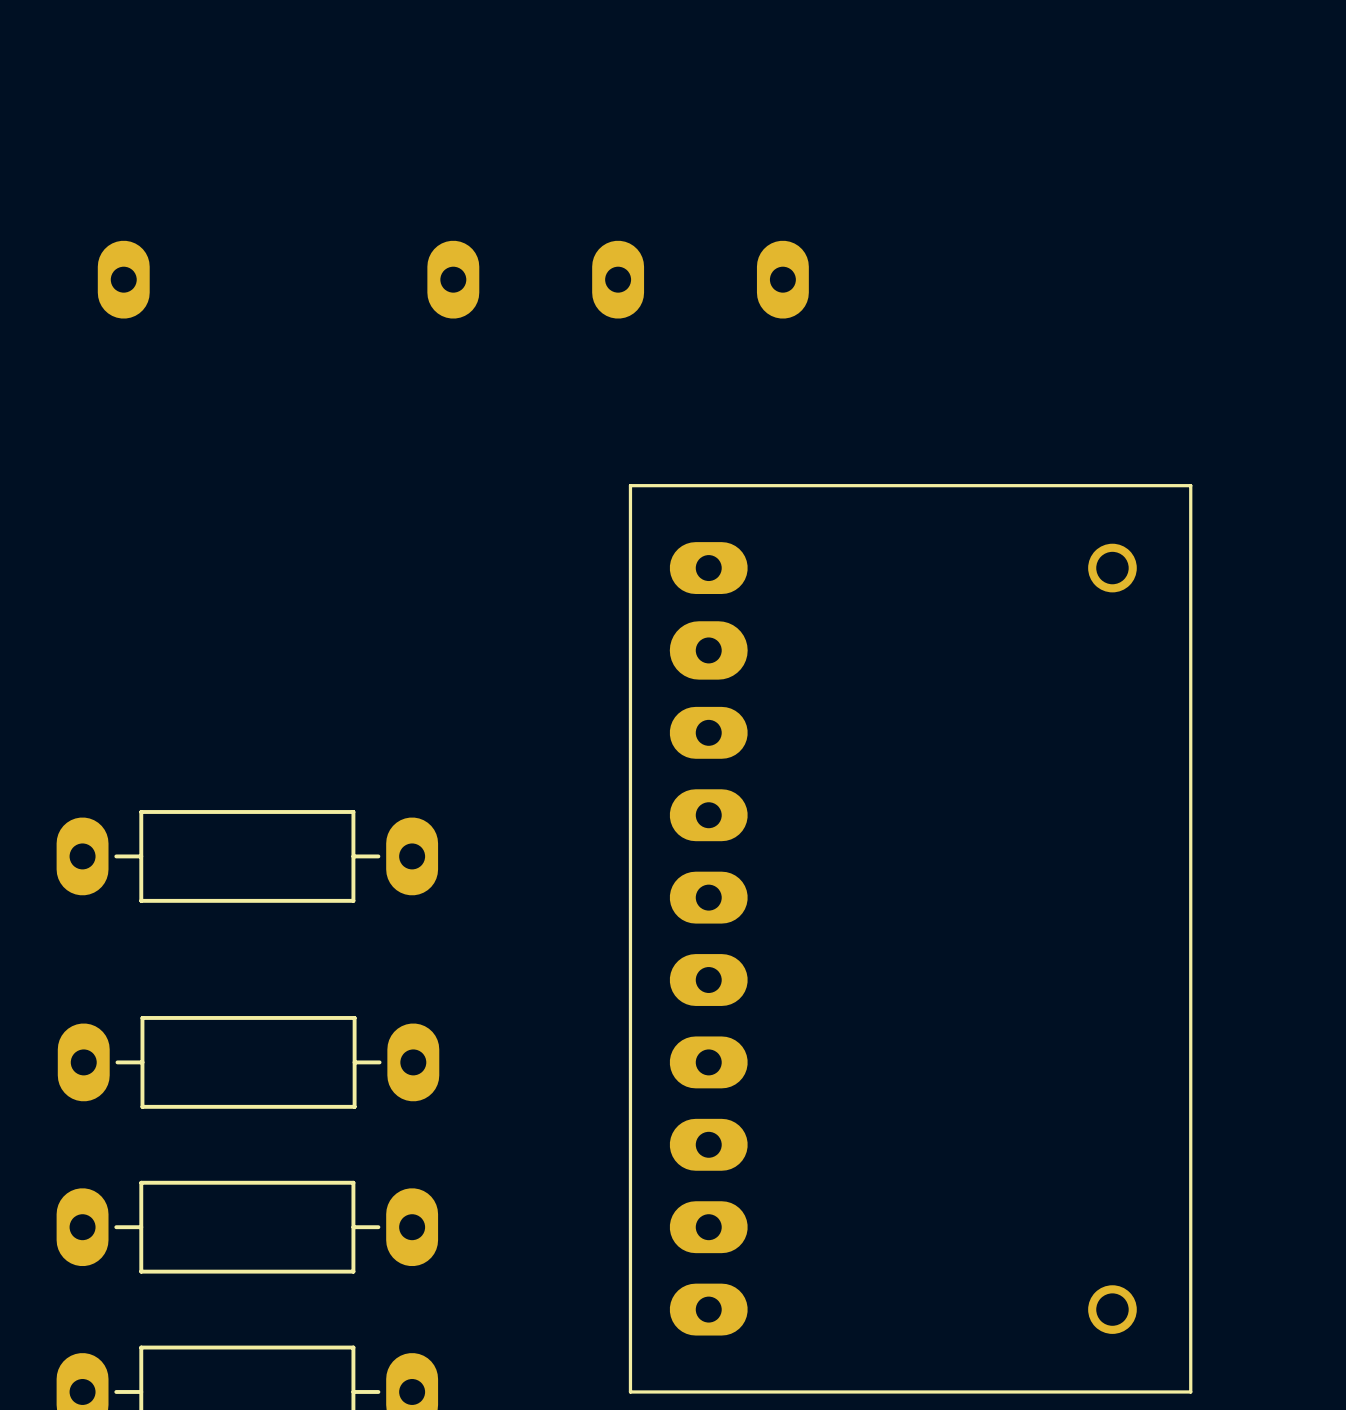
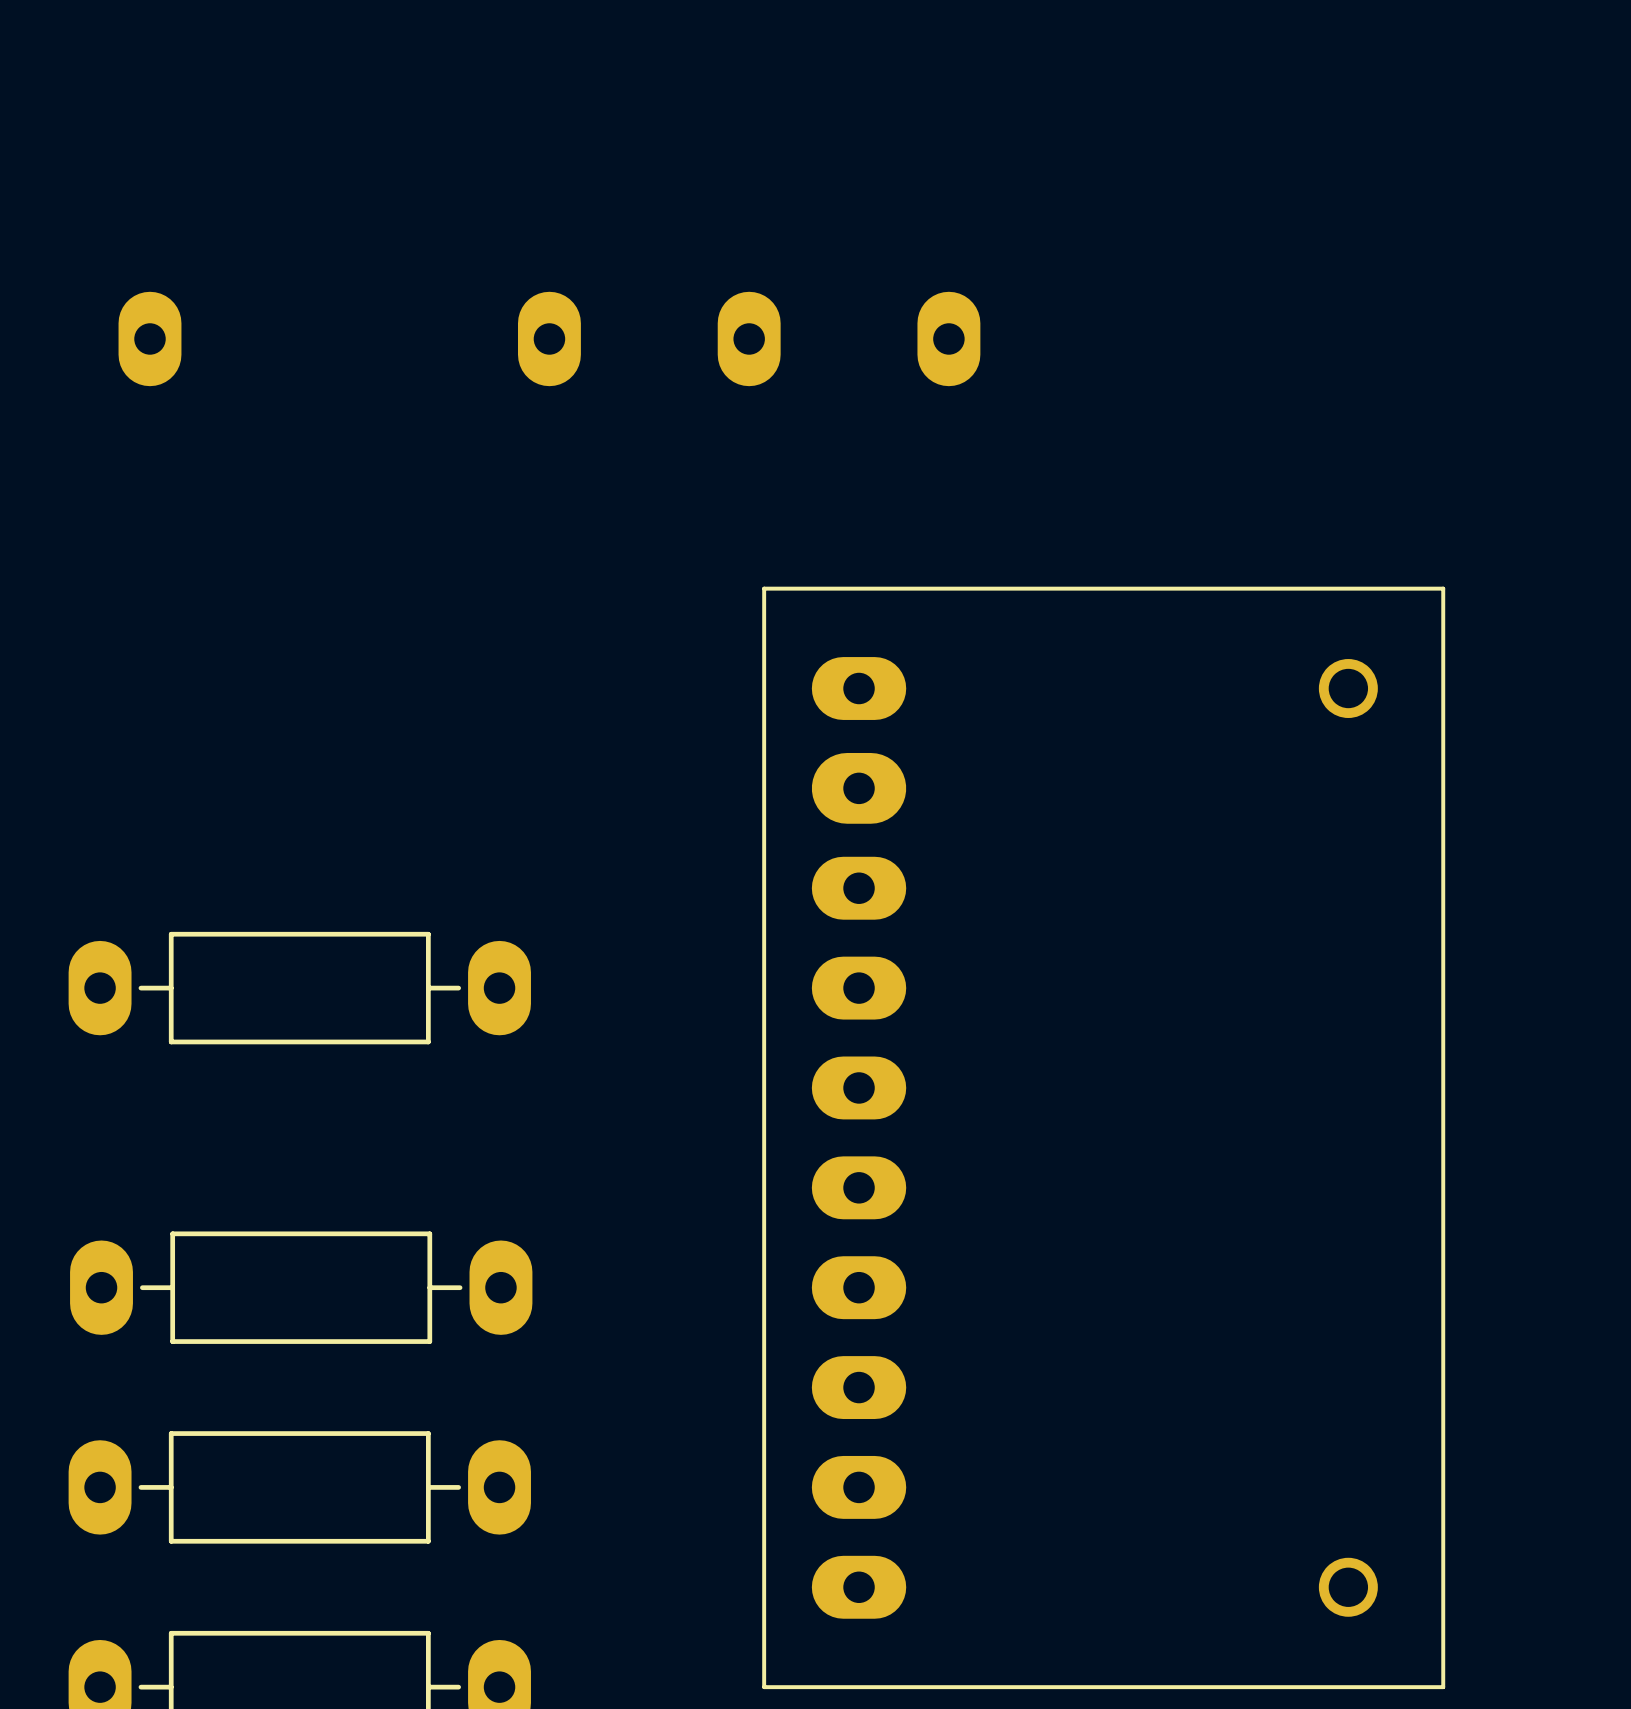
part position: (247, 856) -> (299, 988)

